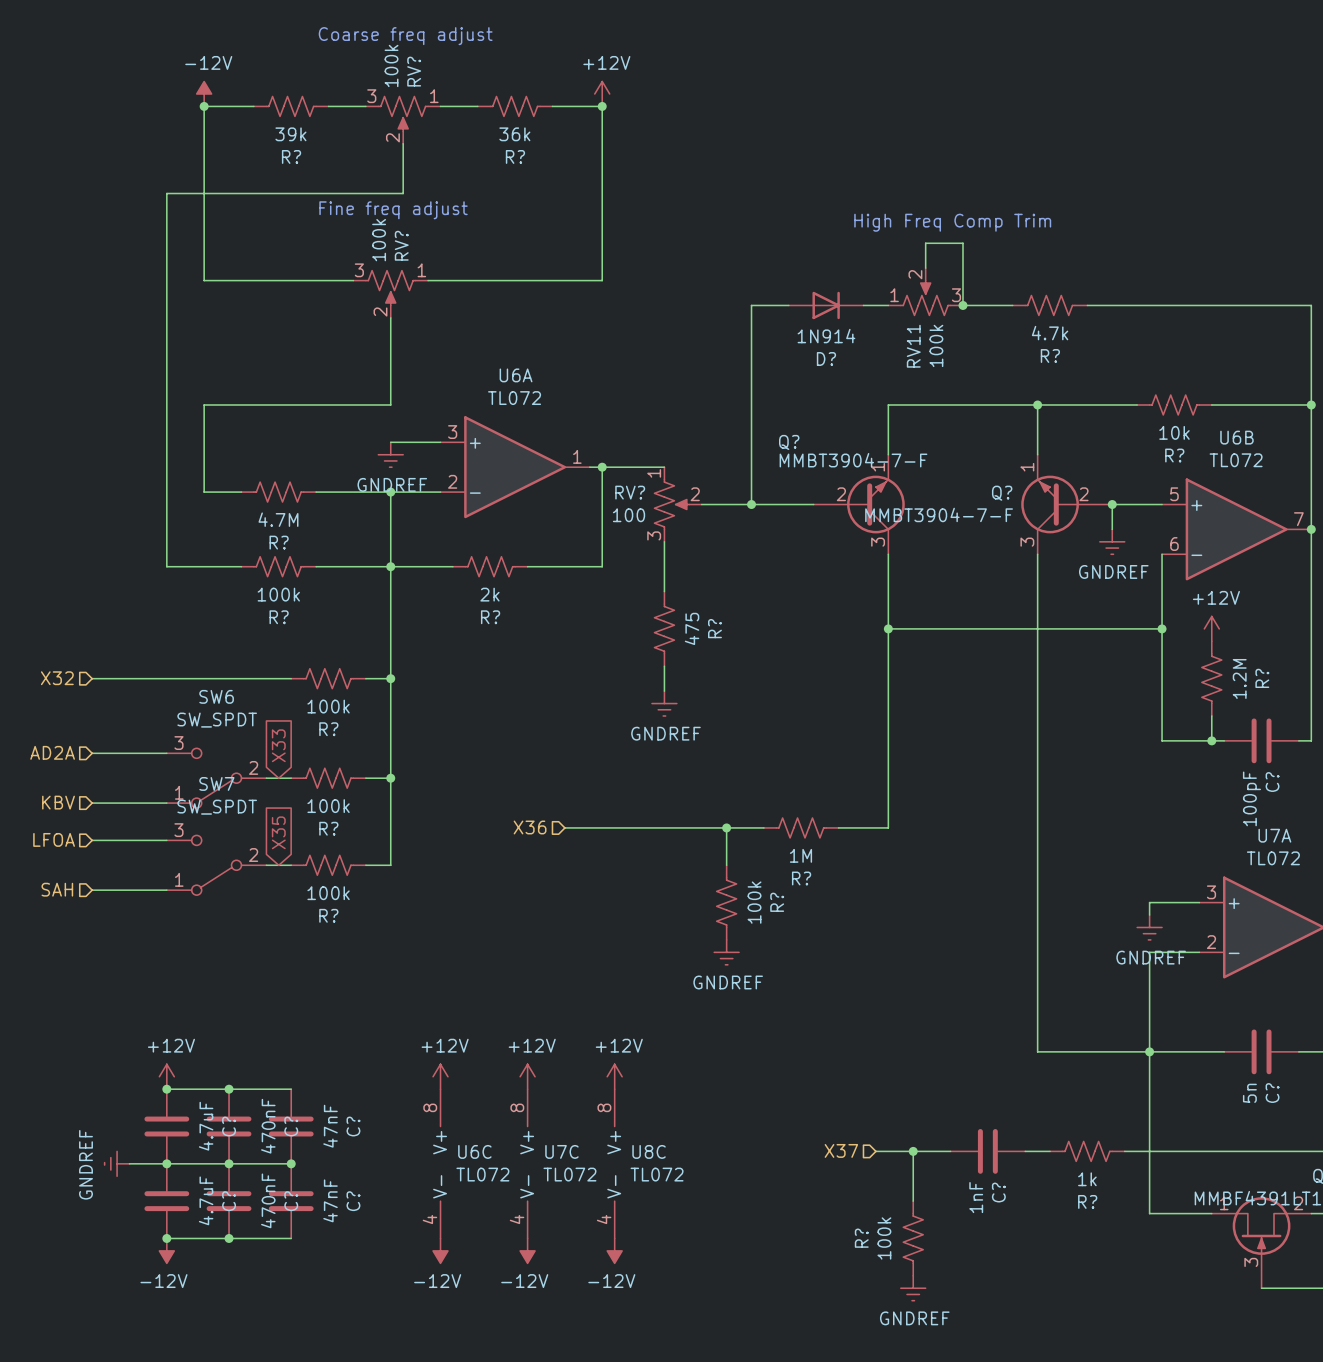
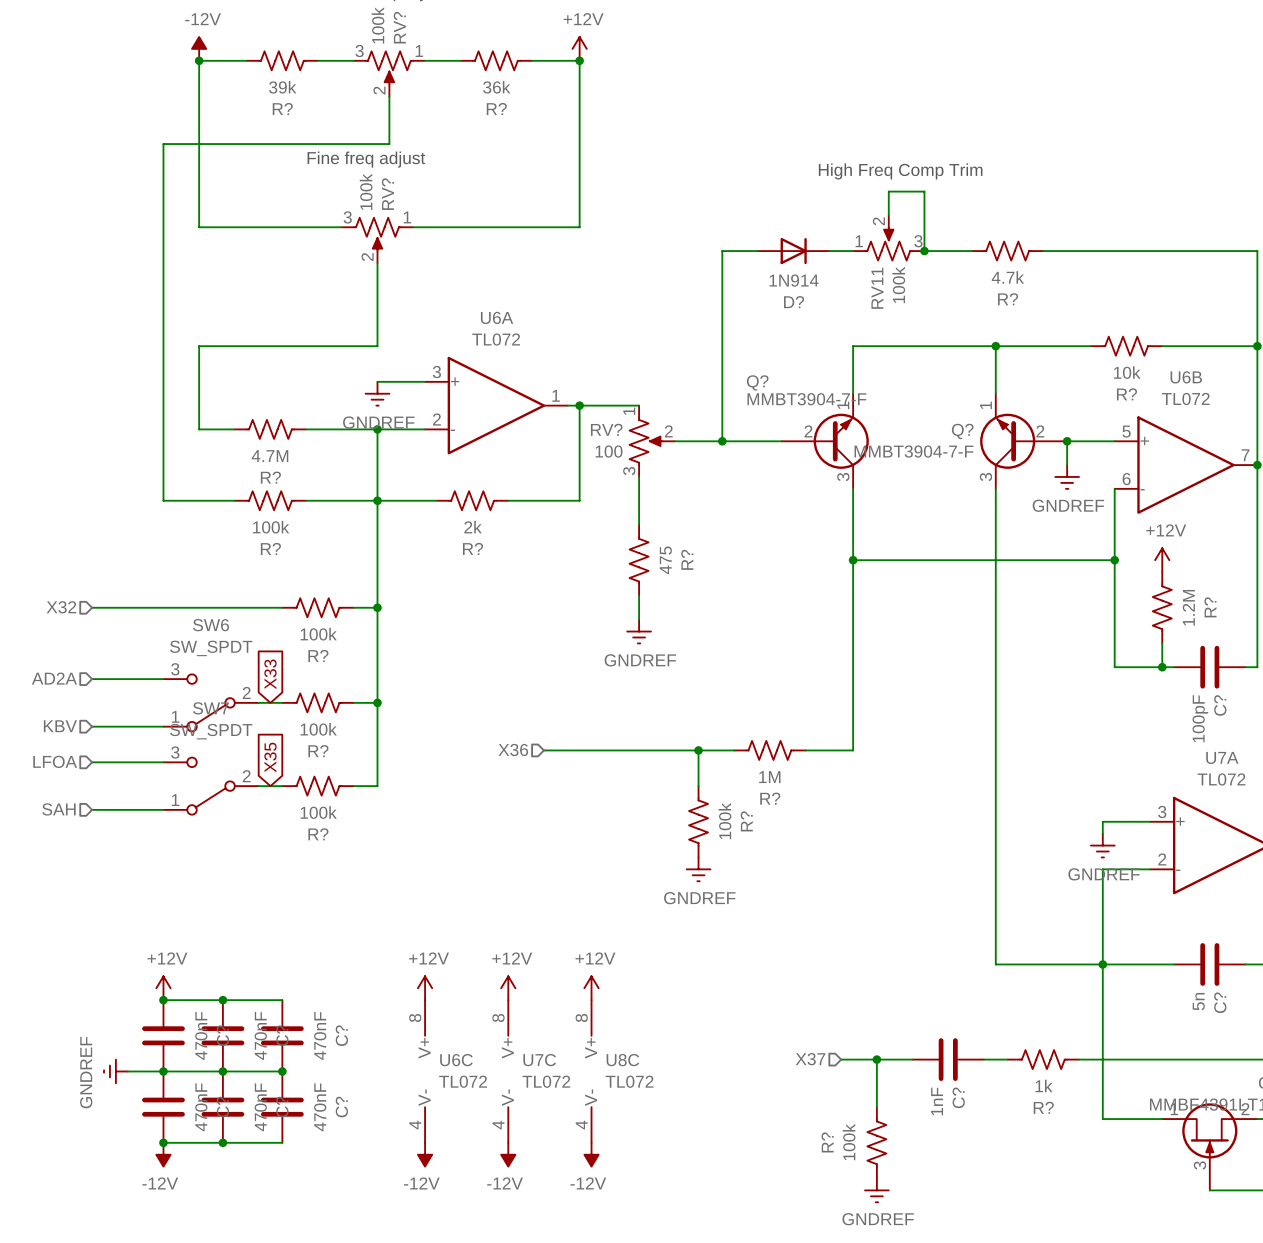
C? value: 4.7uF (206, 1126) -> 470nF (201, 1035)
C? value: 47nF (330, 1126) -> 470nF (320, 1035)
C? value: 4.7uF (206, 1200) -> 470nF (201, 1107)
C? value: 47nF (330, 1200) -> 470nF (320, 1107)

